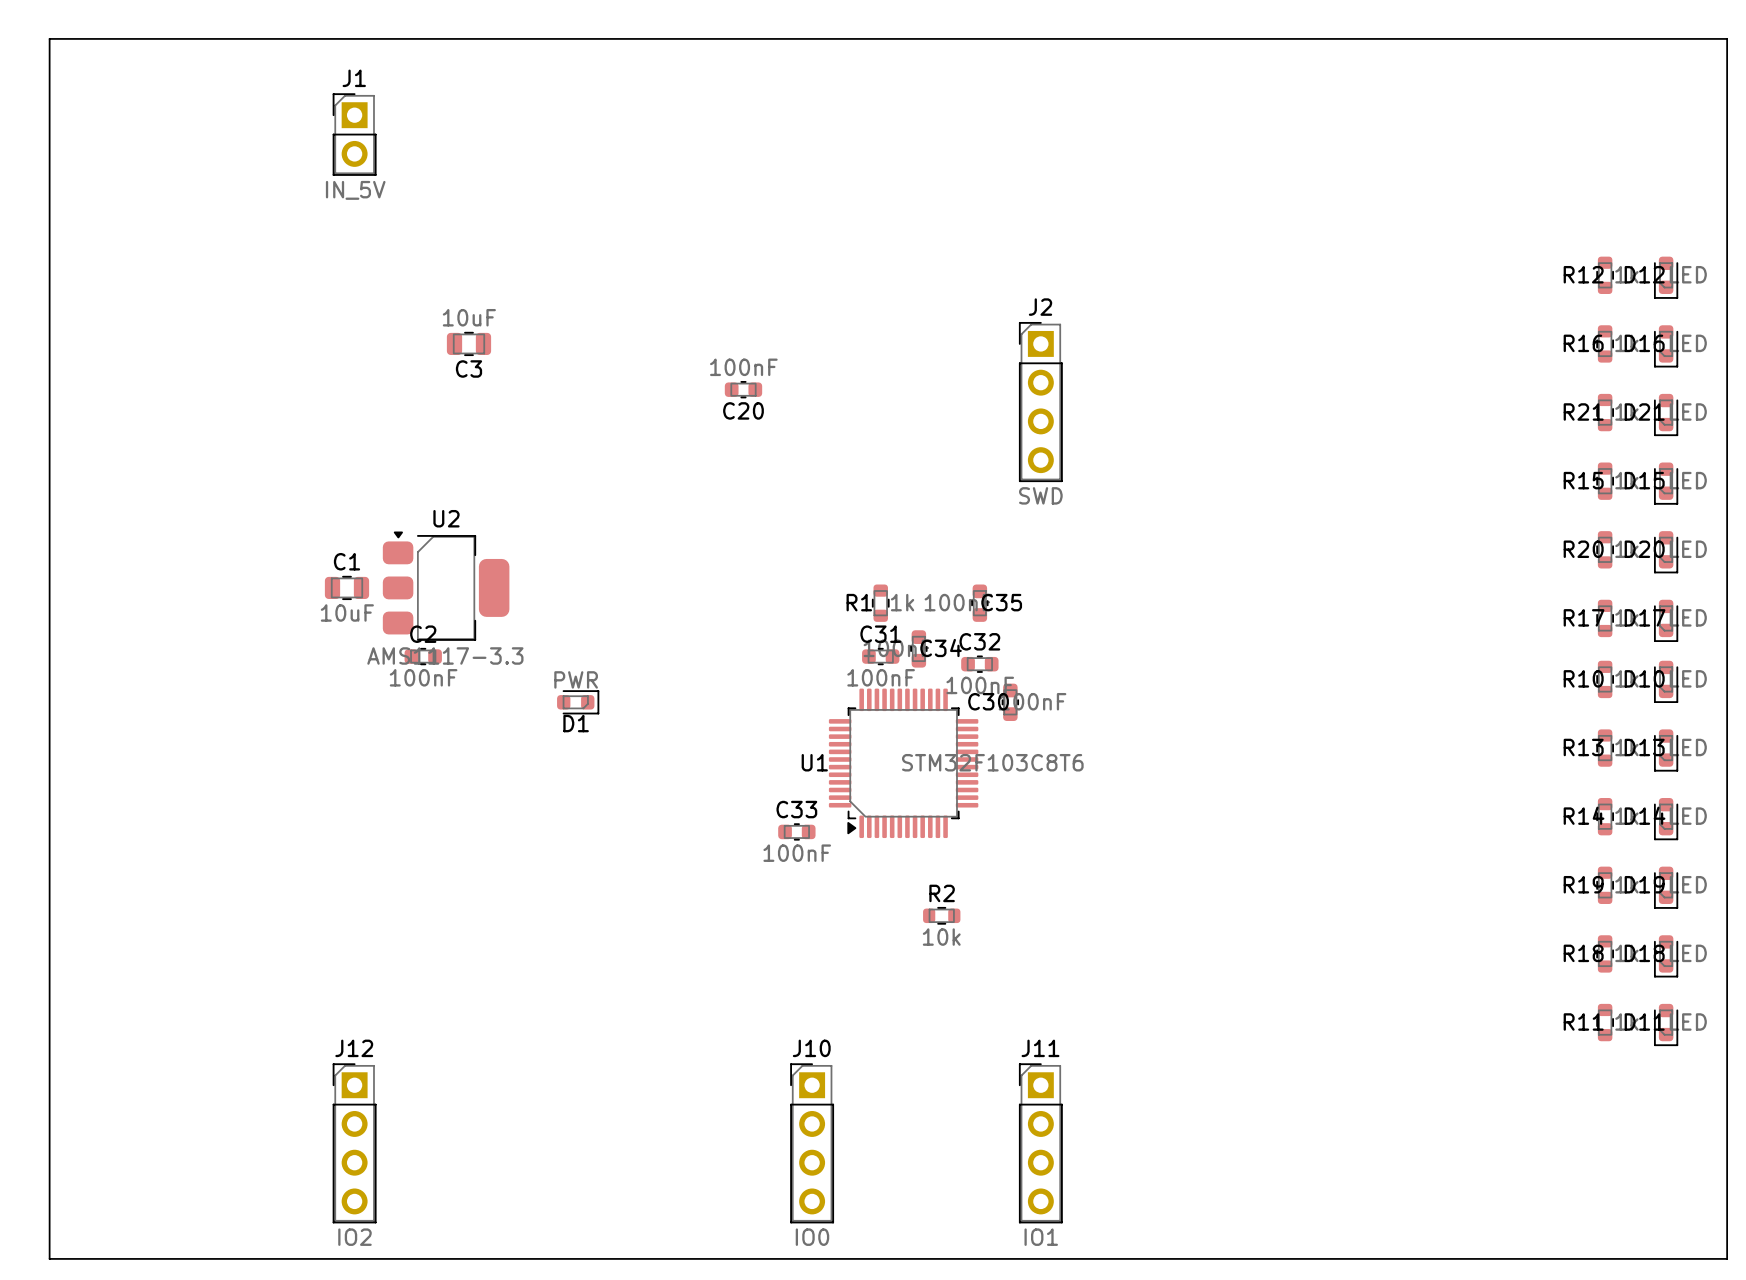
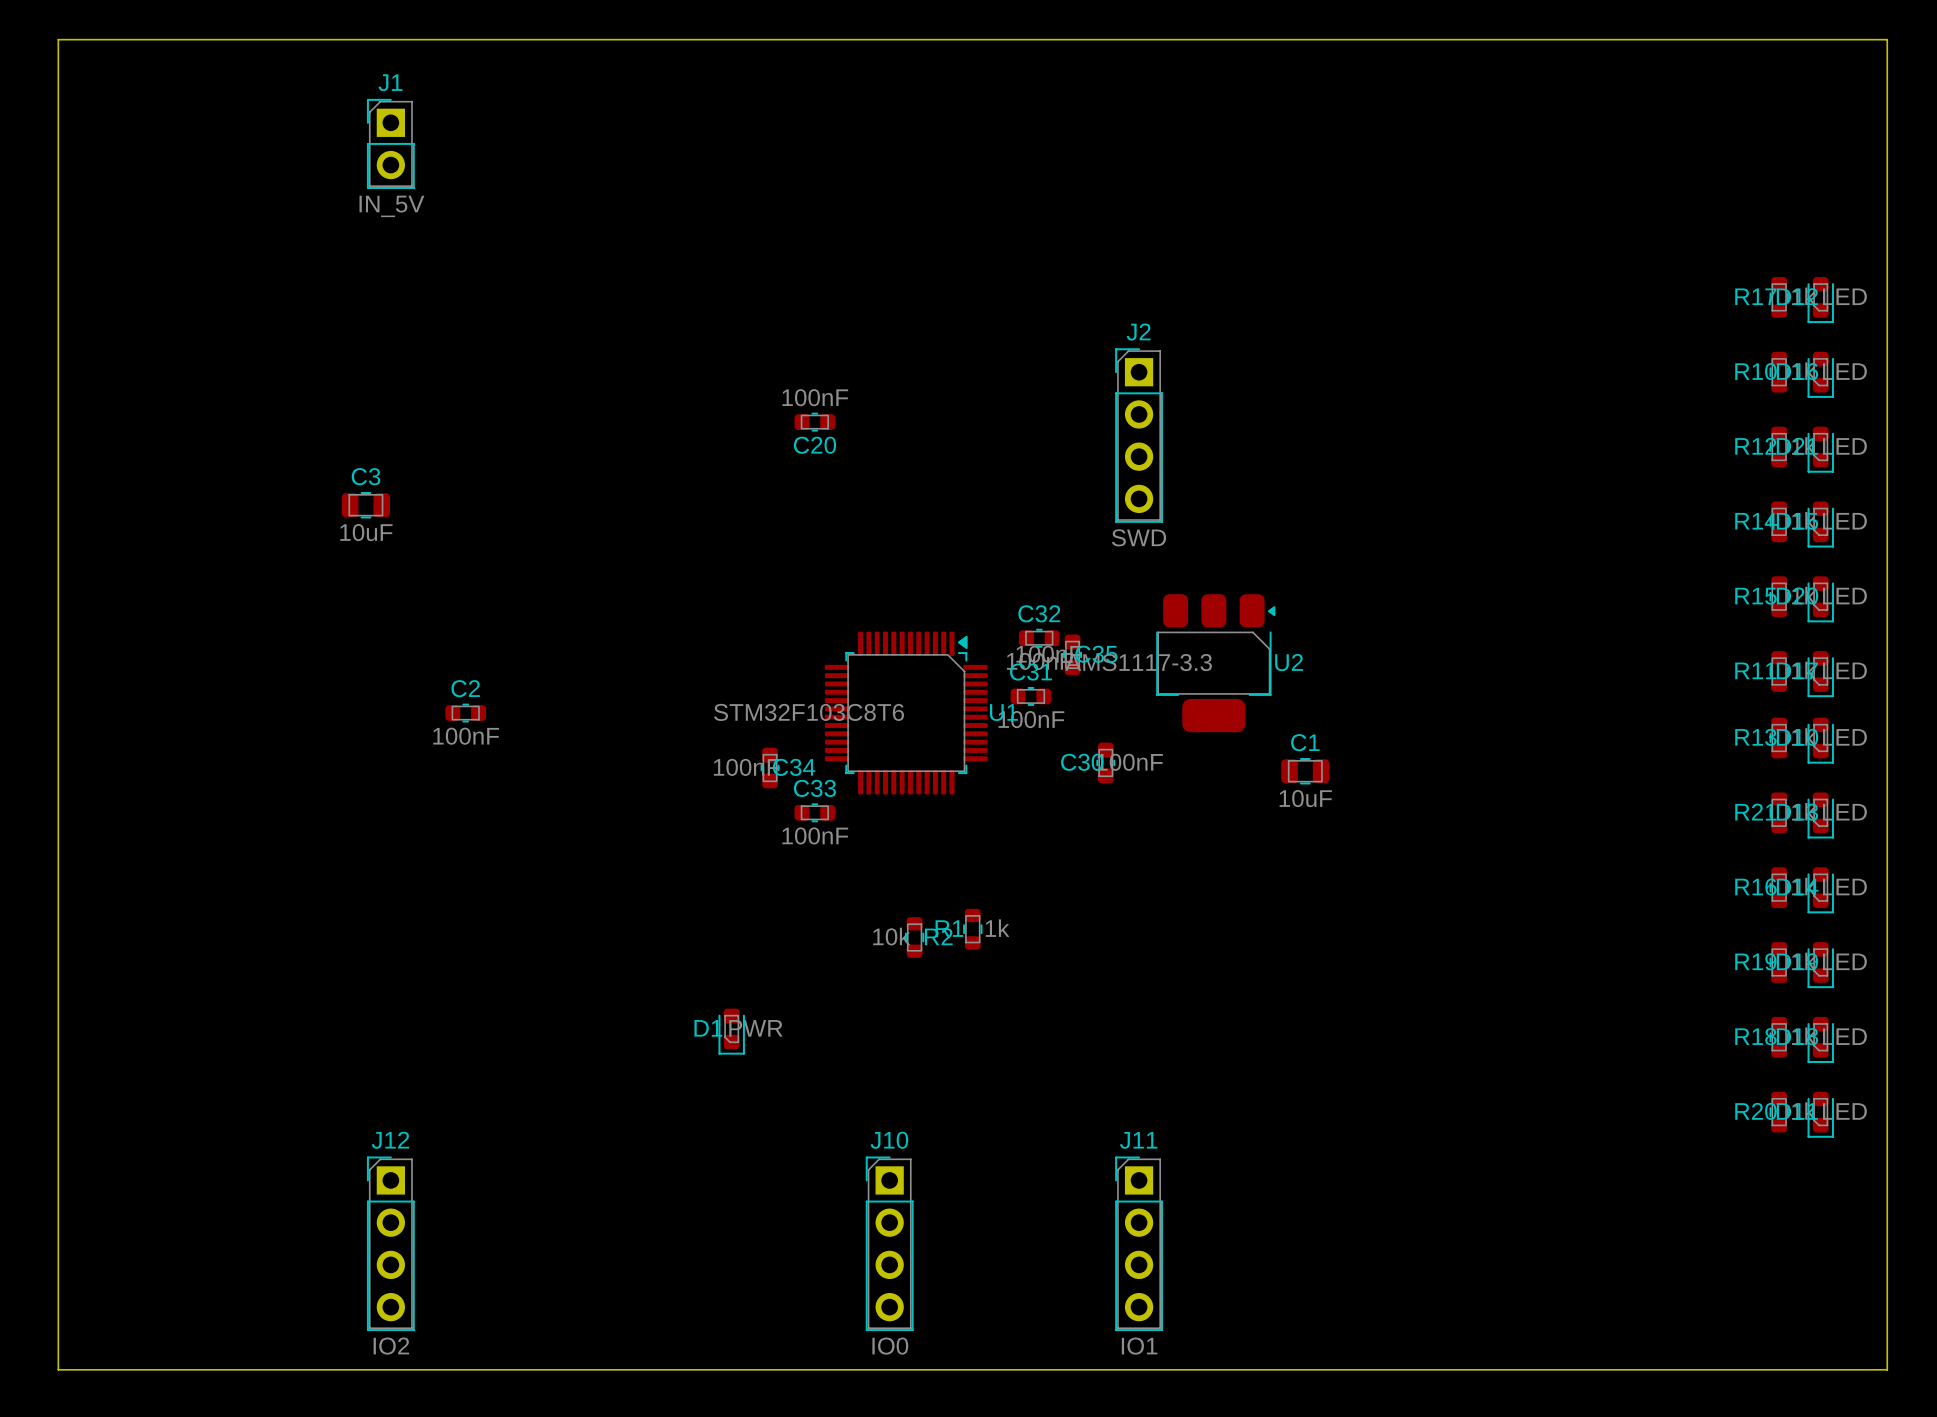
R12 position: (1605, 275) -> (1779, 447)
C3 value position: 10uF (469, 317) -> 10uF (366, 532)
C3 position: (468, 343) -> (365, 505)
R16 position: (1605, 343) -> (1779, 887)
C3 name position: C3 (468, 368) -> C3 (366, 476)
R21 position: (1605, 412) -> (1779, 812)
R15 position: (1605, 481) -> (1779, 596)
R20 position: (1605, 549) -> (1779, 1112)
U2 rotation: 0° (446, 586) -> 90° clockwise (1215, 663)
U2 position: (446, 586) -> (1215, 663)
C1 position: (346, 587) -> (1305, 771)
R1 position: (880, 603) -> (972, 929)
R17 position: (1605, 618) -> (1779, 297)
C34 position: (918, 648) -> (770, 768)
C31 position: (880, 656) -> (1030, 696)
C32 position: (979, 664) -> (1039, 638)
R10 position: (1605, 679) -> (1779, 372)
D1 rotation: 0° (578, 702) -> 90° clockwise (731, 1031)
D1 position: (578, 702) -> (731, 1031)
R13 position: (1605, 748) -> (1779, 737)
U1 rotation: 0° (903, 763) -> 180° (906, 713)
U1 position: (903, 763) -> (906, 713)
R14 position: (1605, 816) -> (1779, 521)
C33 position: (796, 831) -> (814, 812)
R19 position: (1605, 885) -> (1779, 962)
R2 rotation: 0° (941, 915) -> 90° clockwise (914, 937)
R2 position: (941, 915) -> (914, 937)
R18 position: (1605, 953) -> (1779, 1037)
R11 position: (1605, 1022) -> (1779, 671)

